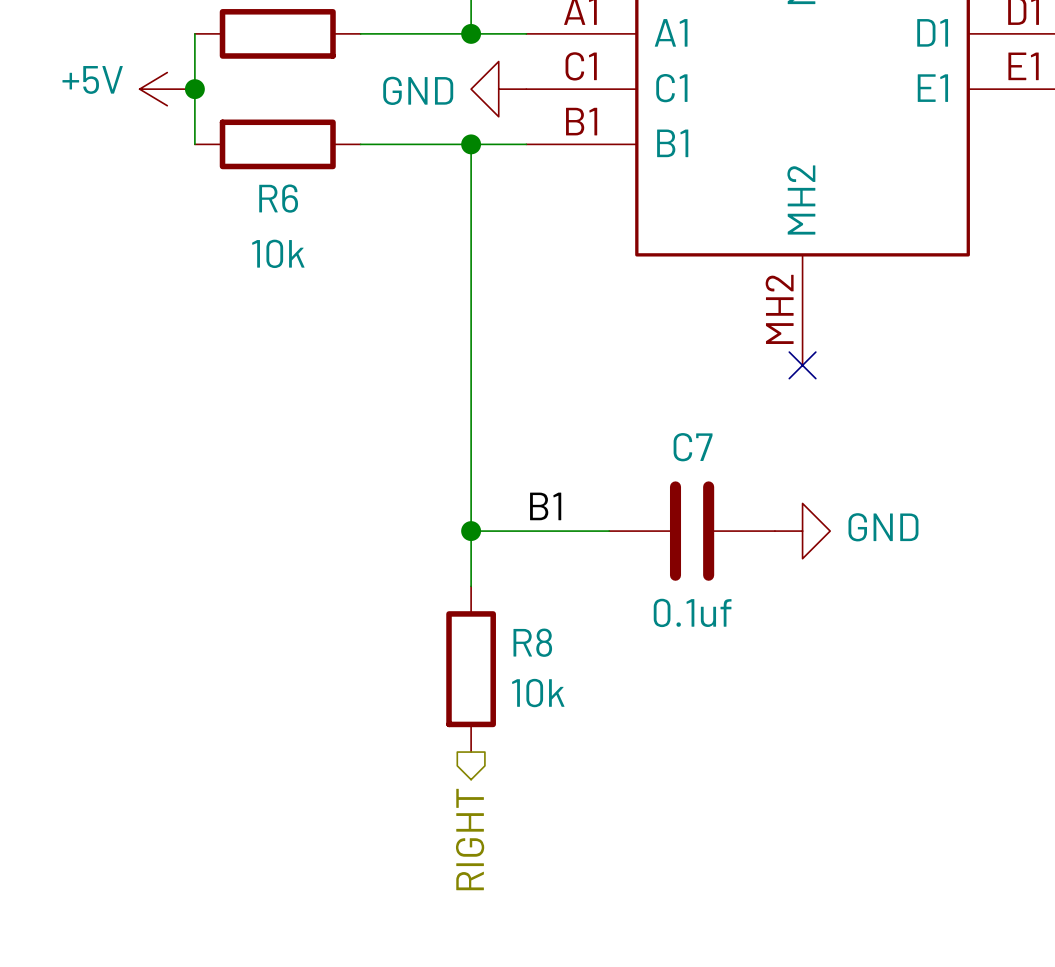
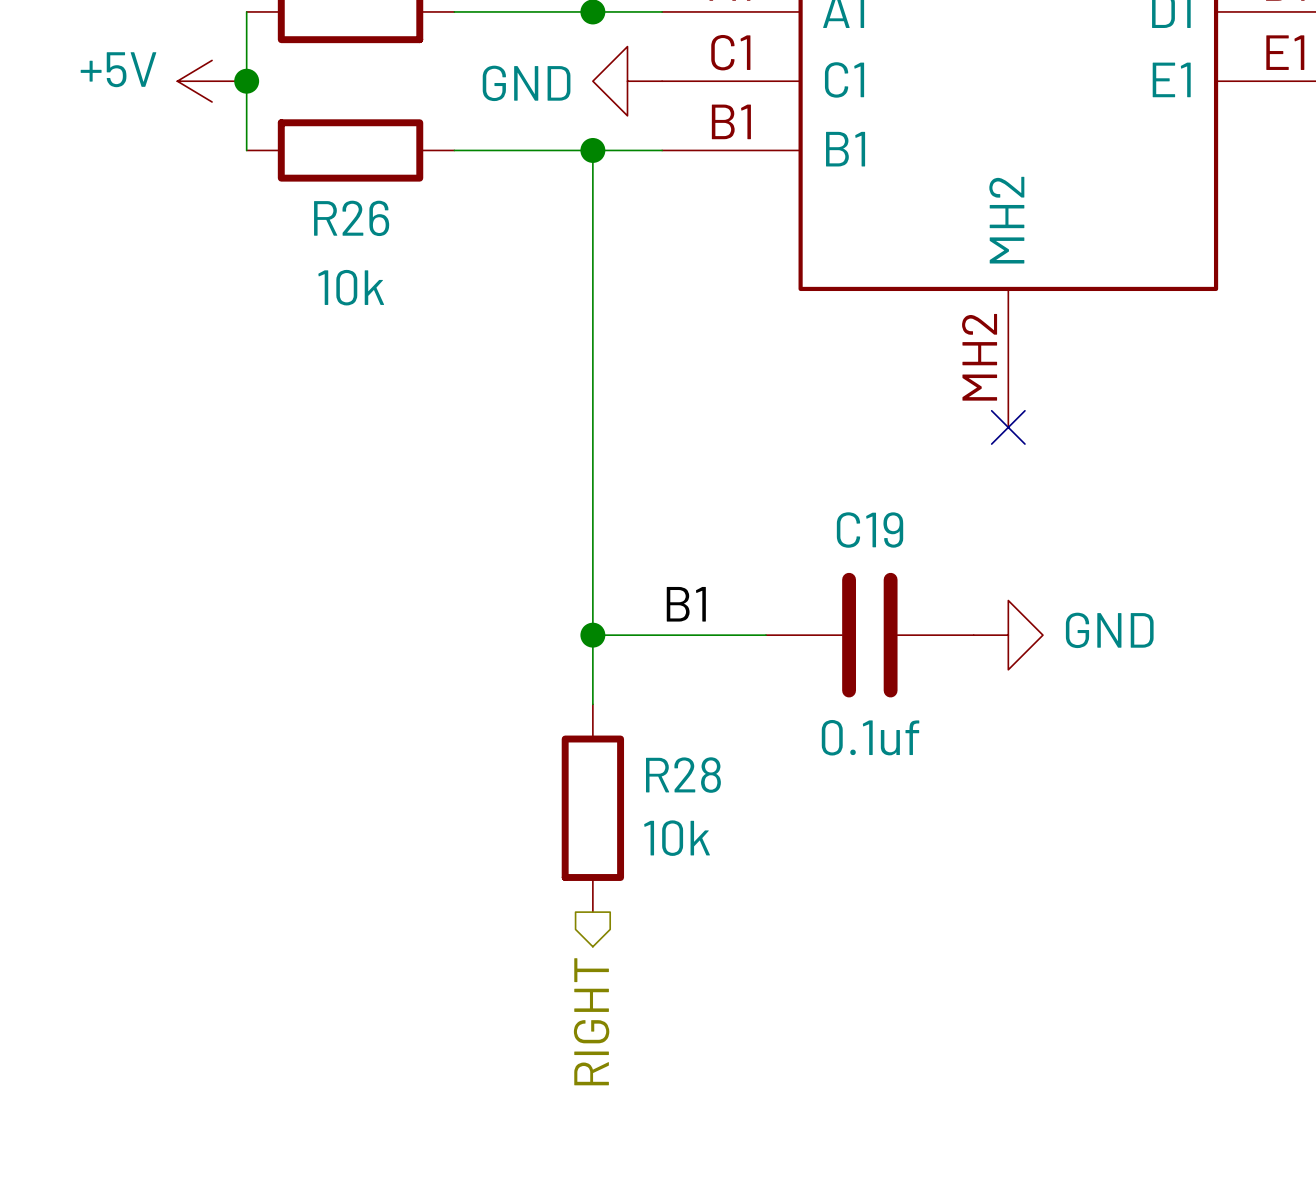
R6 name: R6 (278, 198) -> R26 (351, 218)
C7 name: C7 (693, 447) -> C19 (870, 530)
R8 name: R8 (532, 642) -> R28 (683, 775)

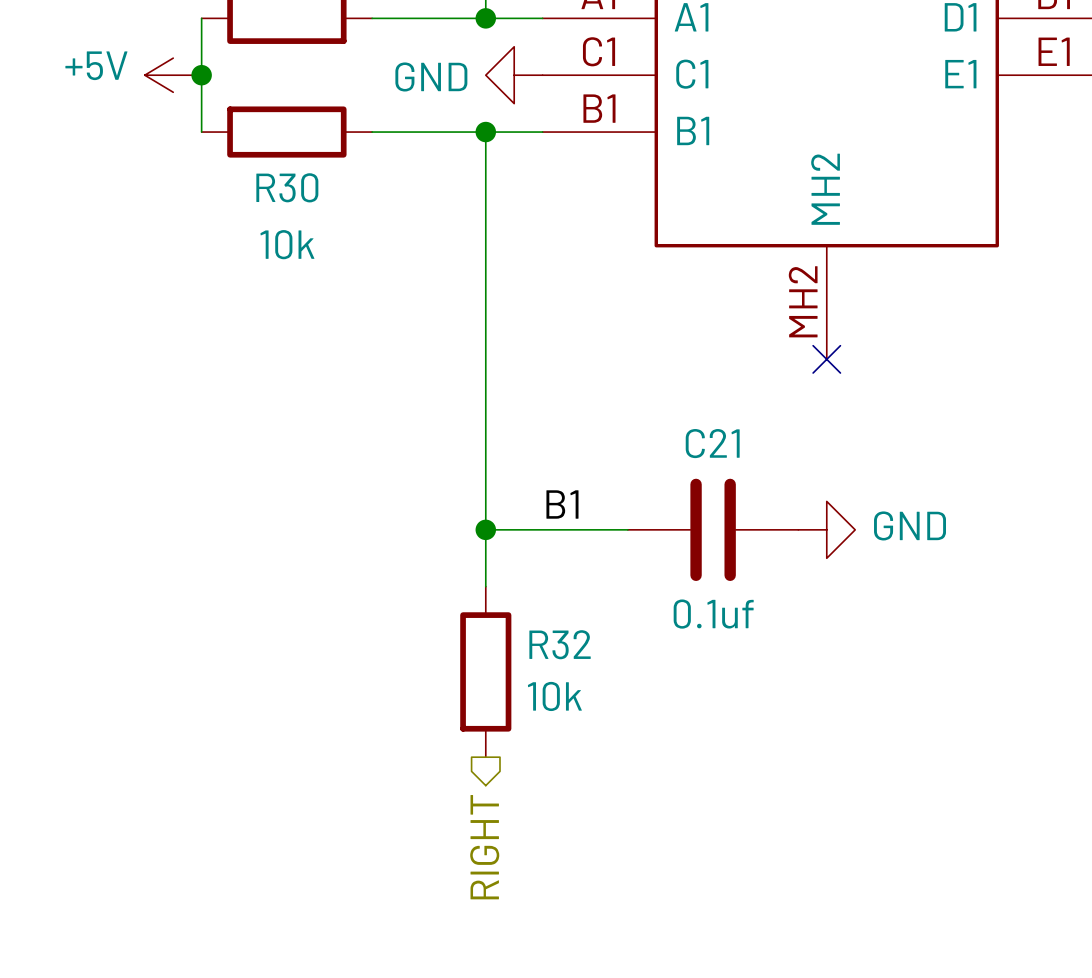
R26 name: R26 (351, 218) -> R30 (287, 187)
C19 name: C19 (870, 530) -> C21 (712, 443)
R28 name: R28 (683, 775) -> R32 (560, 644)

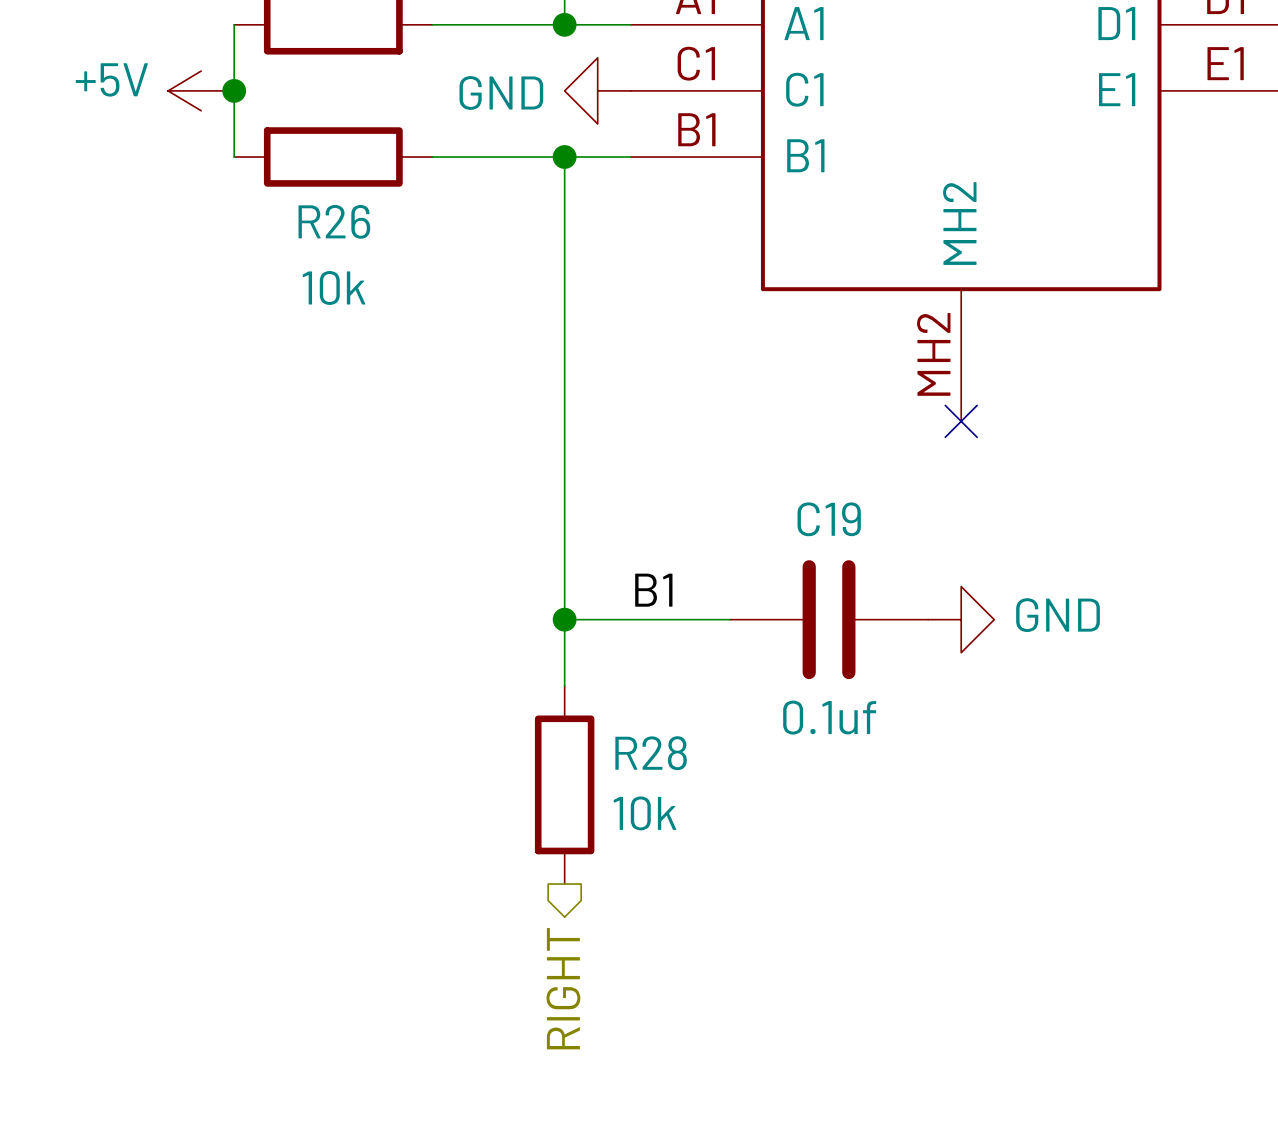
R30 name: R30 (287, 187) -> R26 (334, 221)
C21 name: C21 (712, 443) -> C19 (829, 519)
R32 name: R32 (560, 644) -> R28 (651, 753)

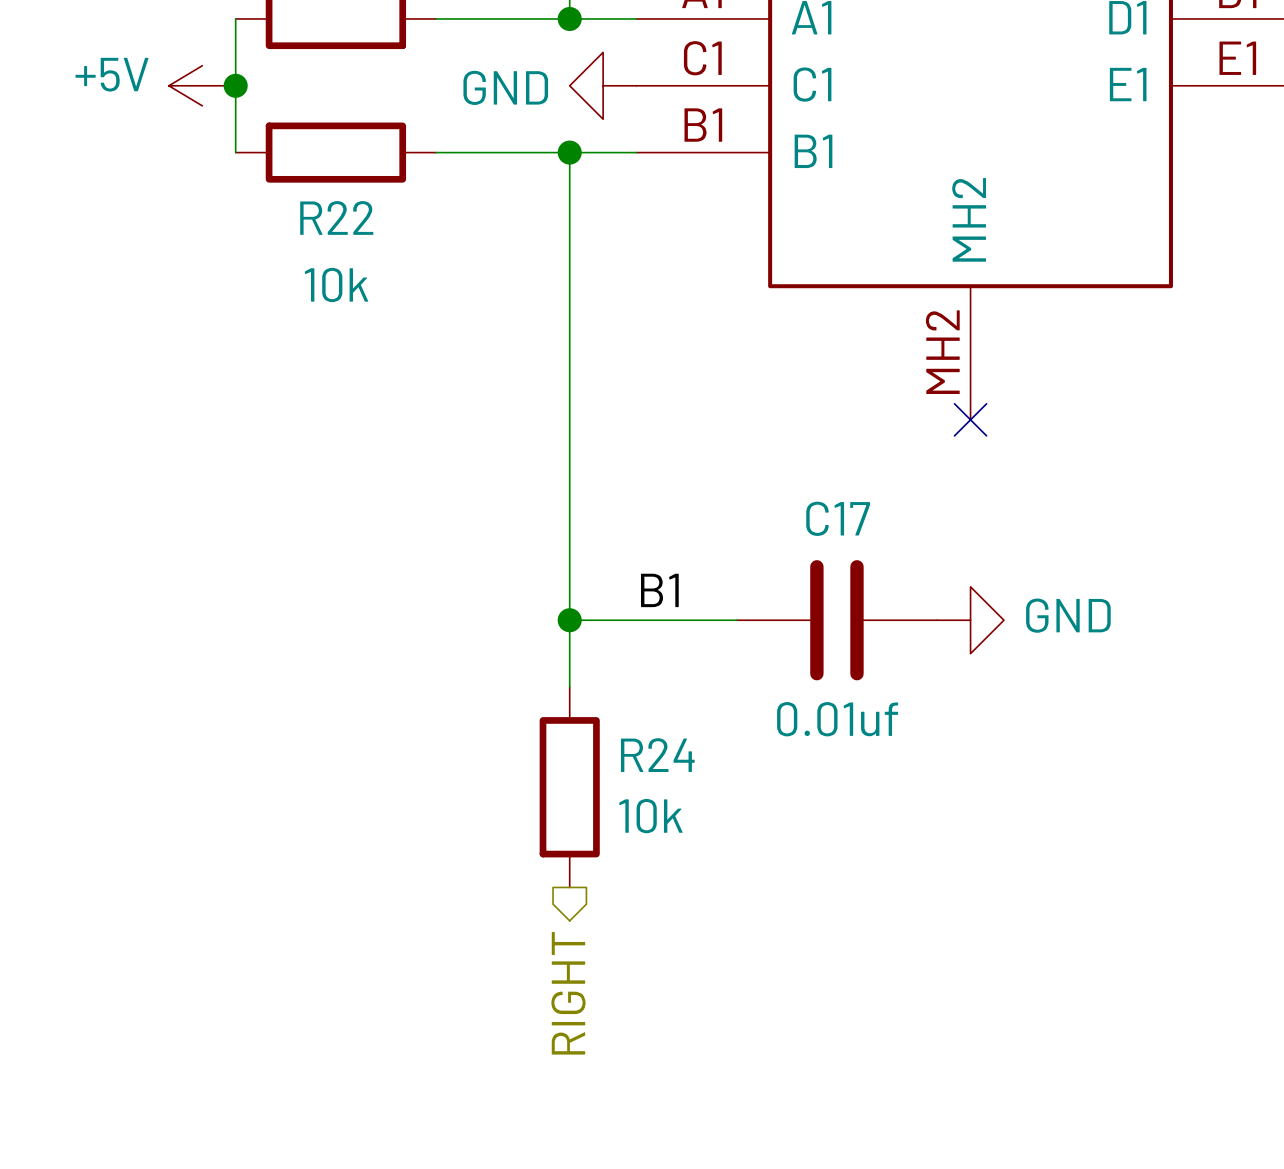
R26 name: R26 (334, 221) -> R22 (336, 217)
C19 name: C19 (829, 519) -> C17 (838, 518)
C19 value: 0.1uf (829, 717) -> 0.01uf (837, 719)
R28 name: R28 (651, 753) -> R24 (657, 755)

